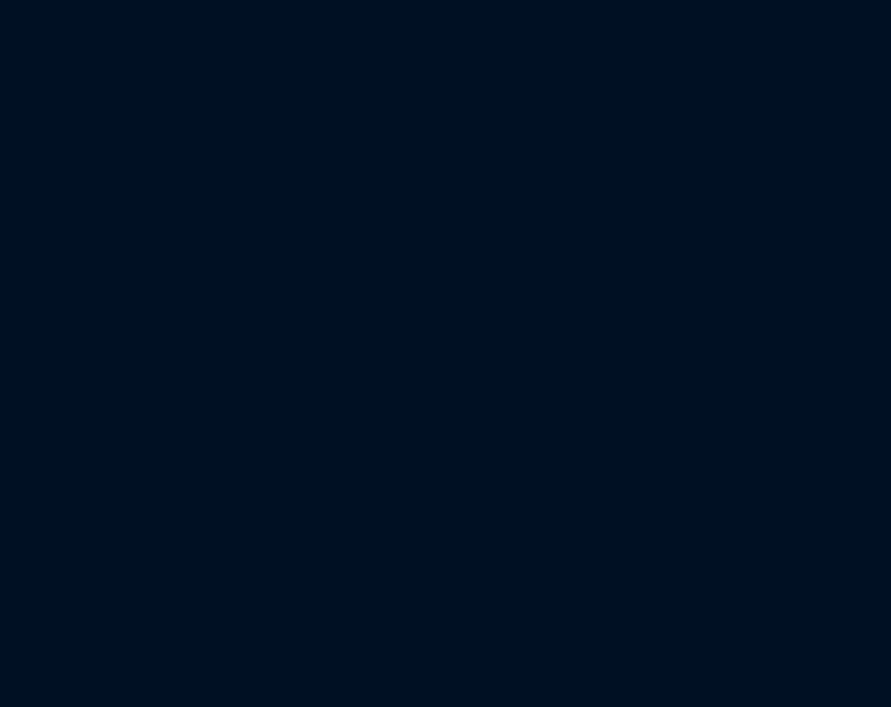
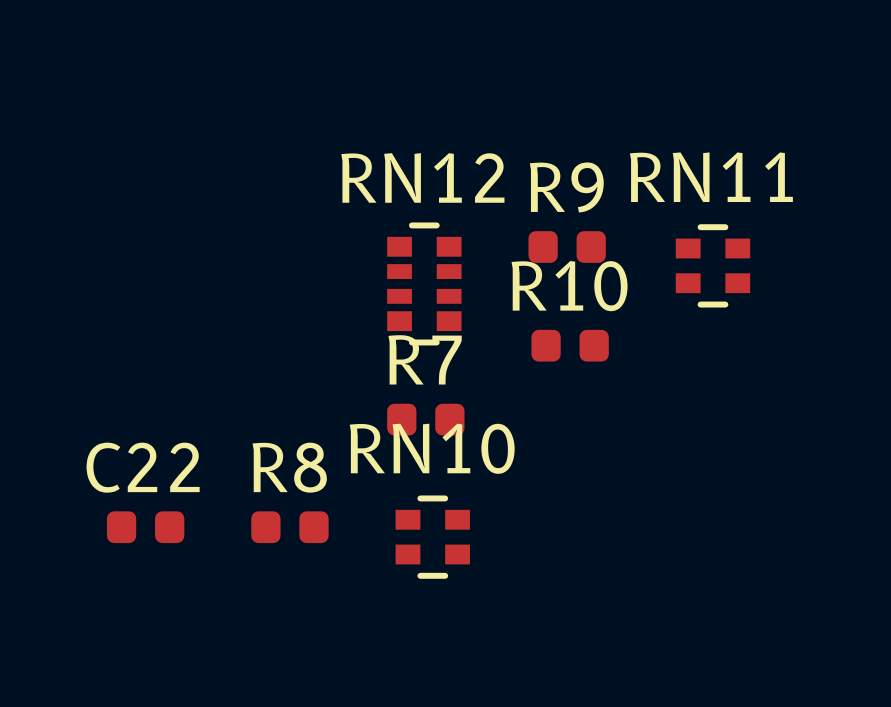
R9: none -> (567, 247)
RN11: none -> (712, 265)
RN12: none -> (424, 283)
R10: none -> (570, 345)
R7: none -> (425, 419)
C22: none -> (145, 527)
R8: none -> (289, 527)
RN10: none -> (432, 537)

